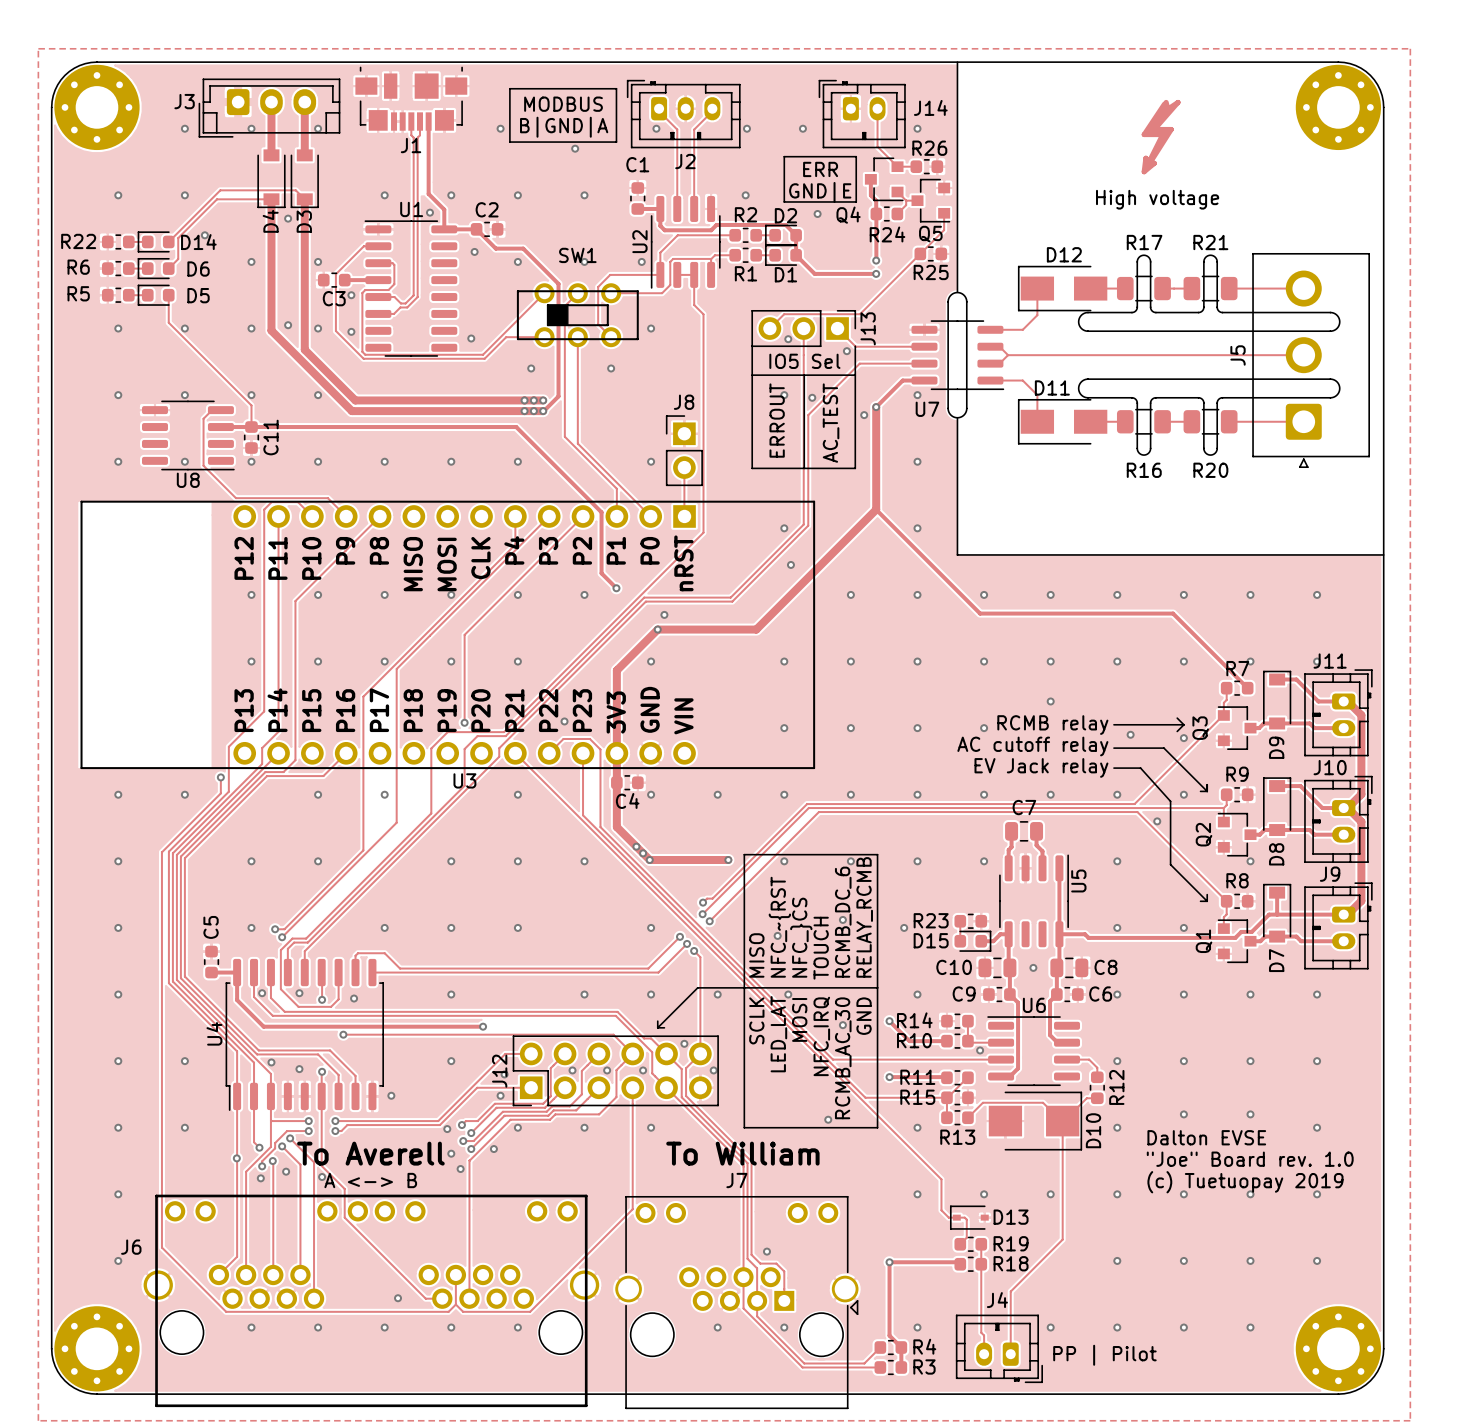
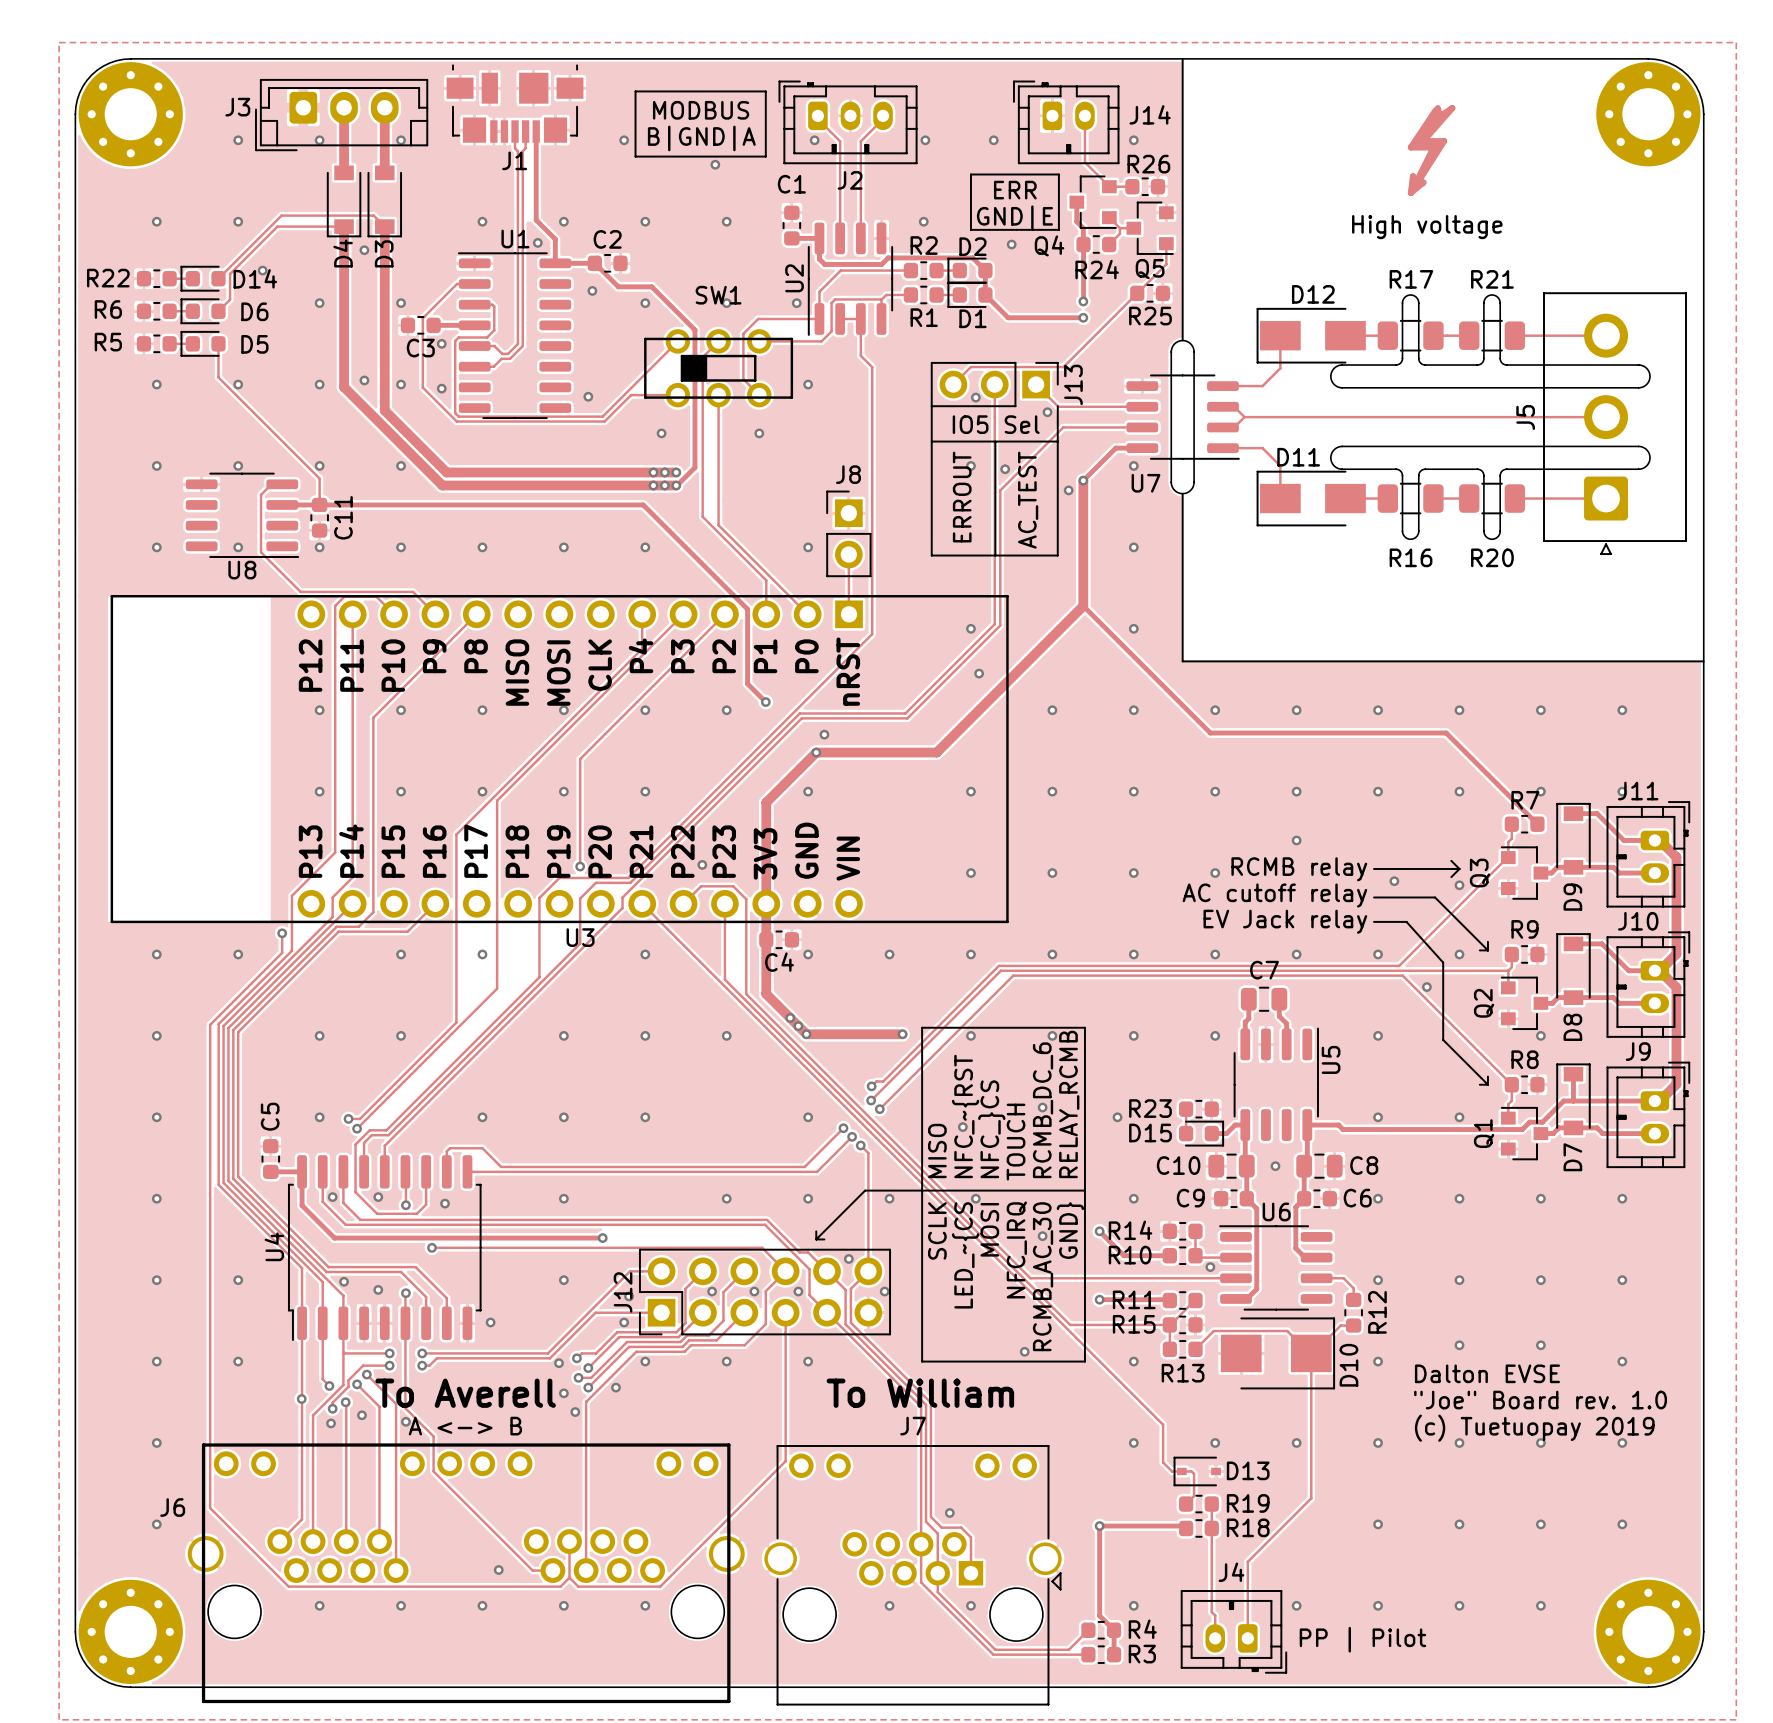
track: (1059, 868) (1059, 934) -> none
text: GND (864, 1016) -> GND} (1070, 1230)
text: LED_LAT (778, 1034) -> LED_~{CS (965, 1255)

